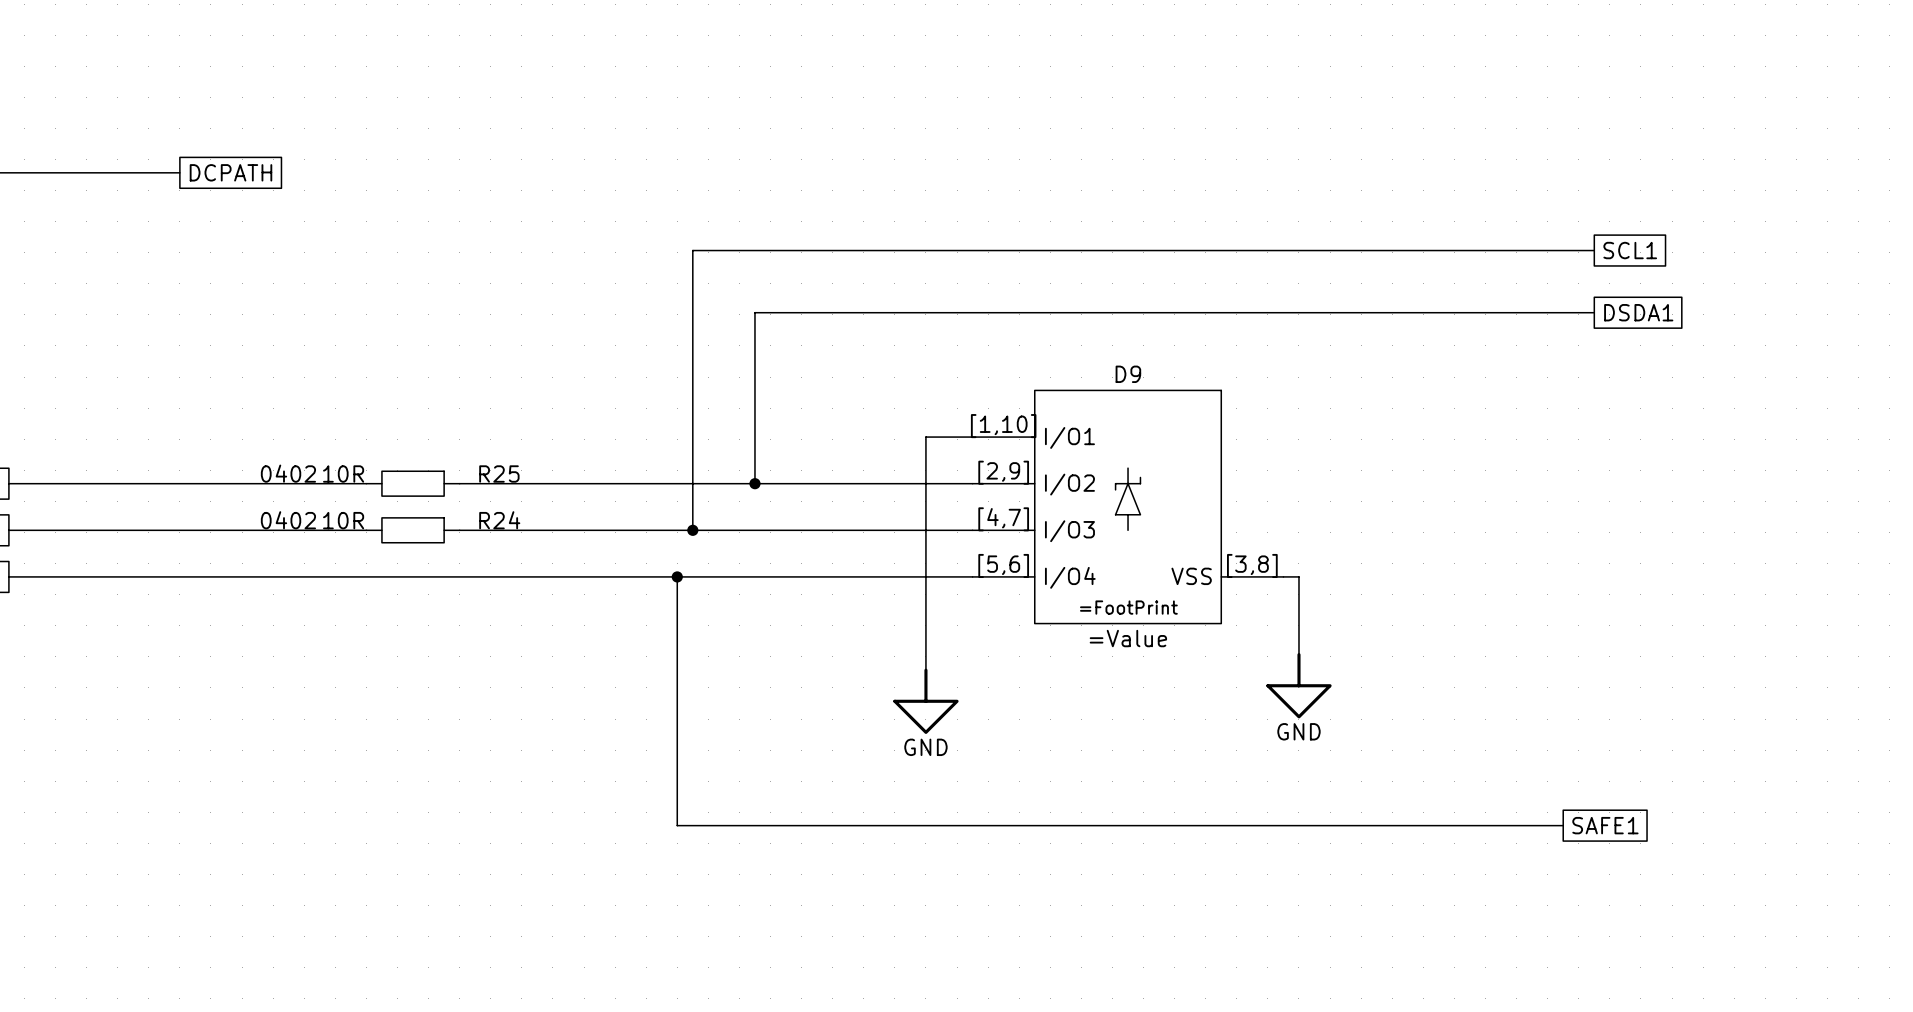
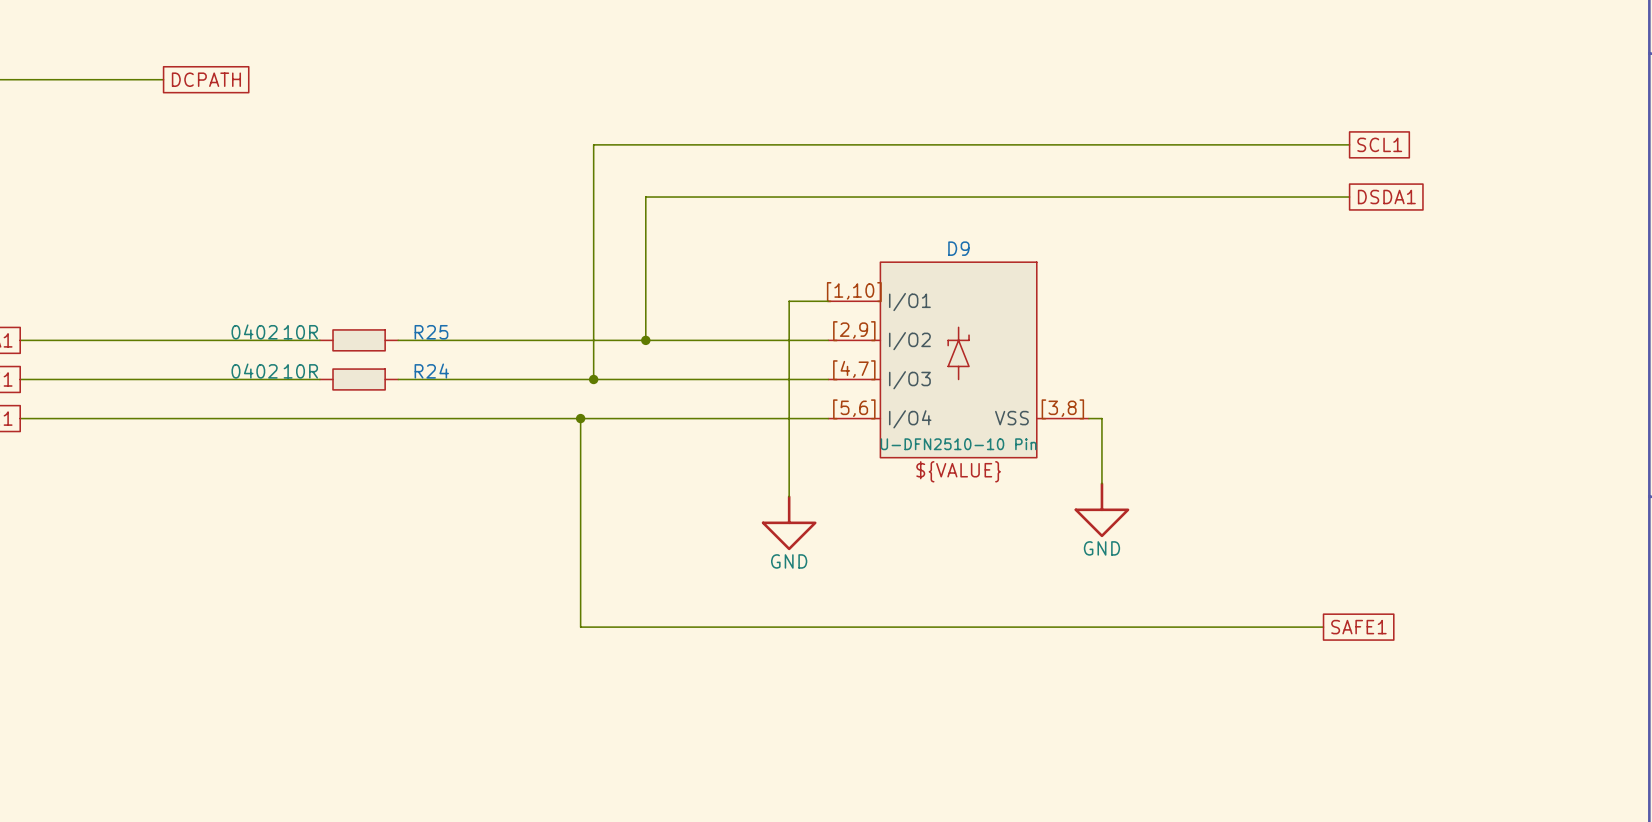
D9 text: =FootPrint (1128, 607) -> none
D9 text: none -> U-DFN2510-10 Pin (958, 444)
D9 text: =Value (1128, 638) -> ${VALUE} (958, 471)

